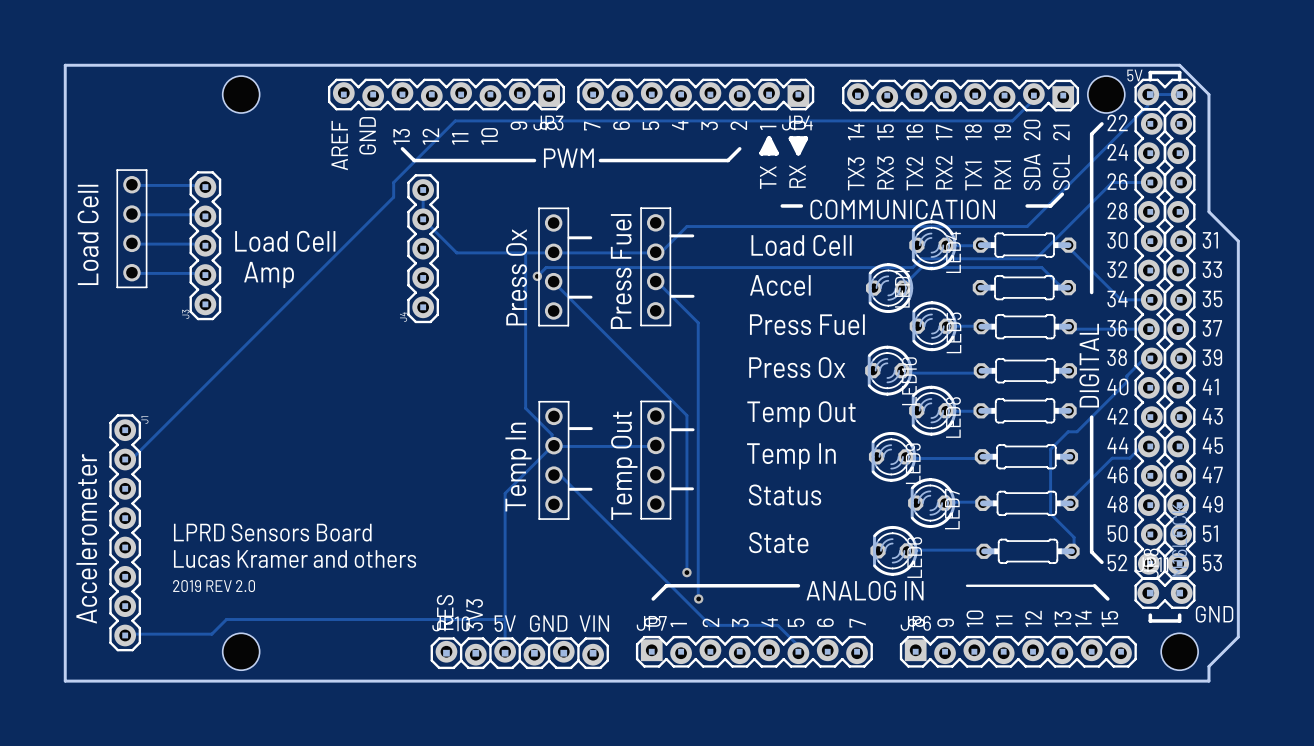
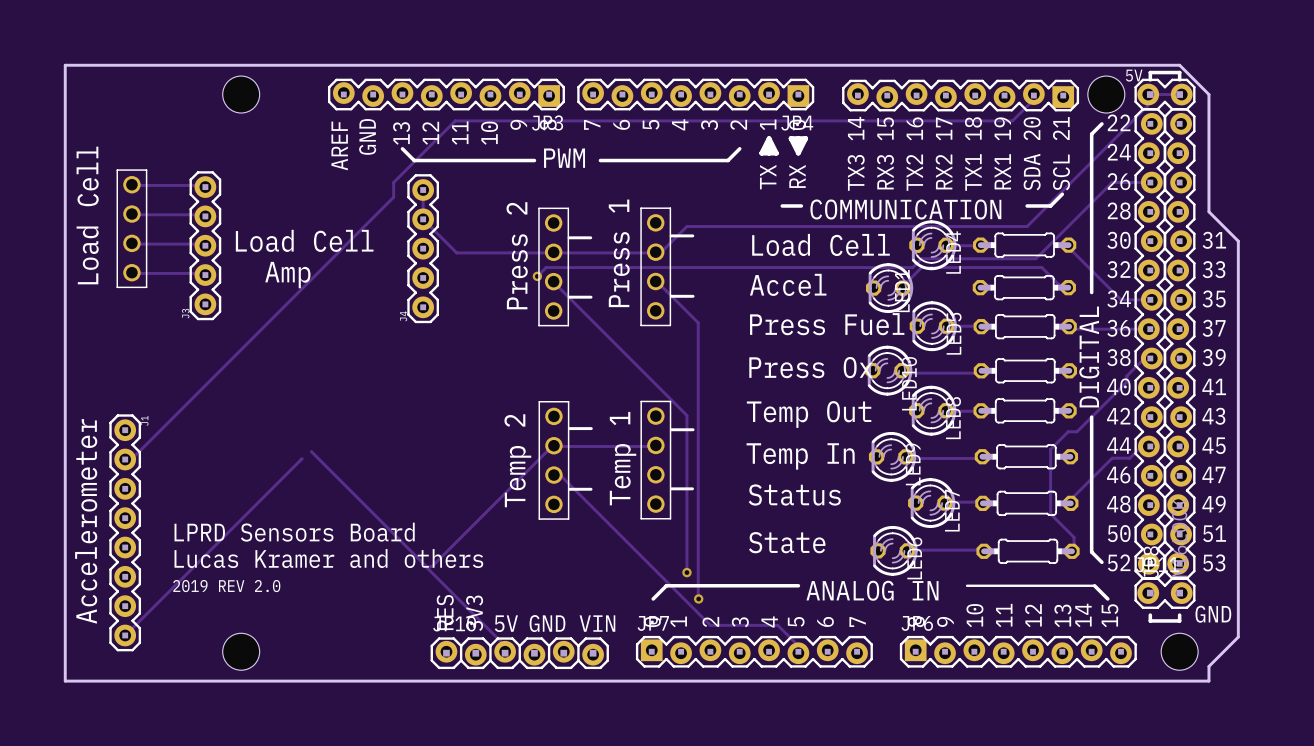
track: (525, 252) (525, 408) (552, 434) (552, 443) (553, 445) -> none
text: Press Fuel (621, 271) -> Press 1 (619, 253)
text: Press Ox (516, 277) -> Press 2 (517, 255)
track: none -> (311, 451) (426, 566)
text: Temp Out (624, 465) -> Temp 1 (623, 458)
text: Temp In (518, 467) -> Temp 2 (517, 460)
track: (505, 493) (505, 645) -> (505, 493) (431, 566) (425, 566) (505, 645)
track: (505, 619) (226, 619) (211, 634) (125, 634) -> (302, 458) (125, 634)

